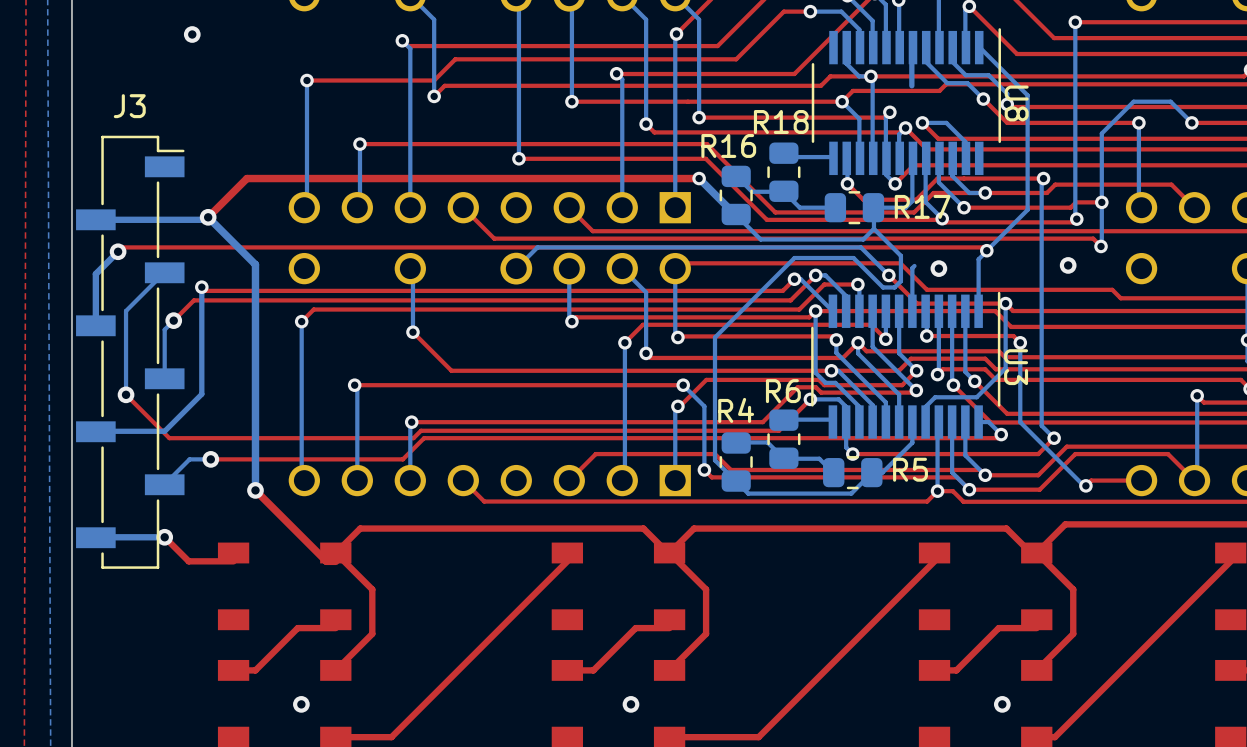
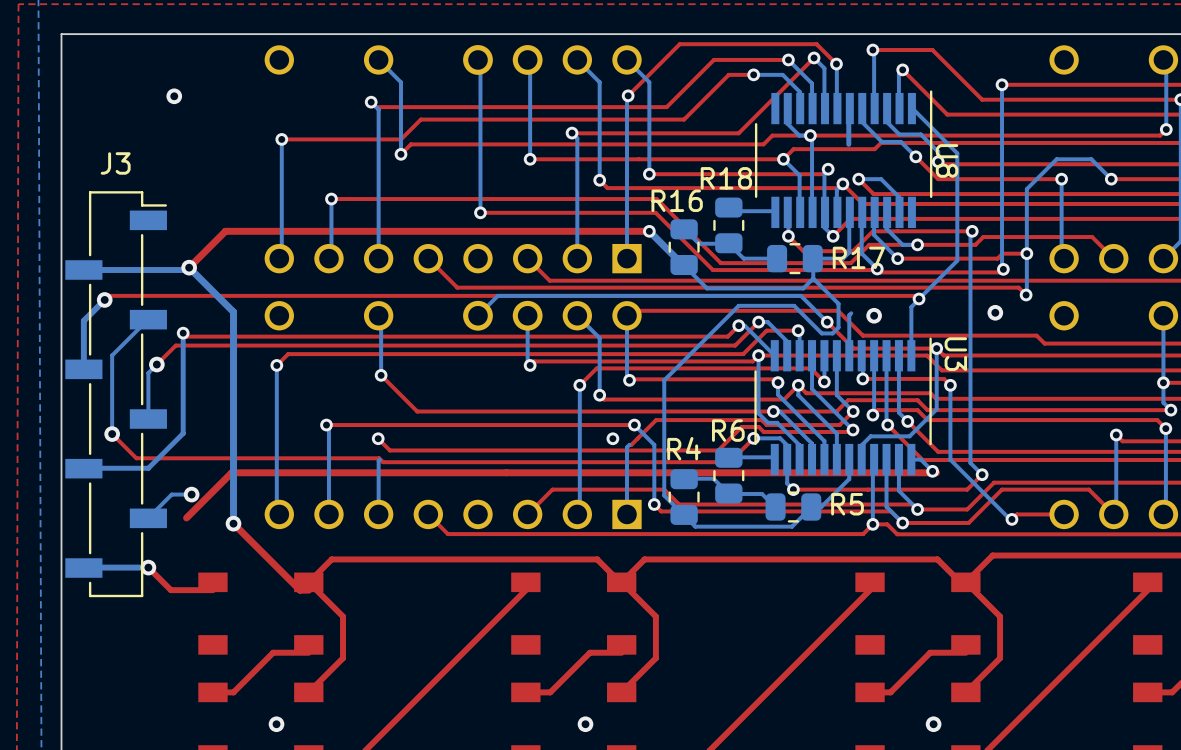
U3 name position: U3 (1016, 367) -> U3 (955, 354)
via position: (677, 406) -> (612, 438)
top track: (772, 412) (762, 422) (411, 422) -> (718, 450) (389, 450) (378, 438)
top track: (151, 420) (169, 438) (413, 438) (421, 430) (779, 430) (784, 424) -> (136, 458) (379, 458) (383, 462) (729, 462)
via position: (411, 422) -> (378, 438)
top track: (1001, 434) (997, 438) (424, 438) (402, 459) (210, 459) -> none
top track: none -> (936, 472) (231, 472) (186, 517)

